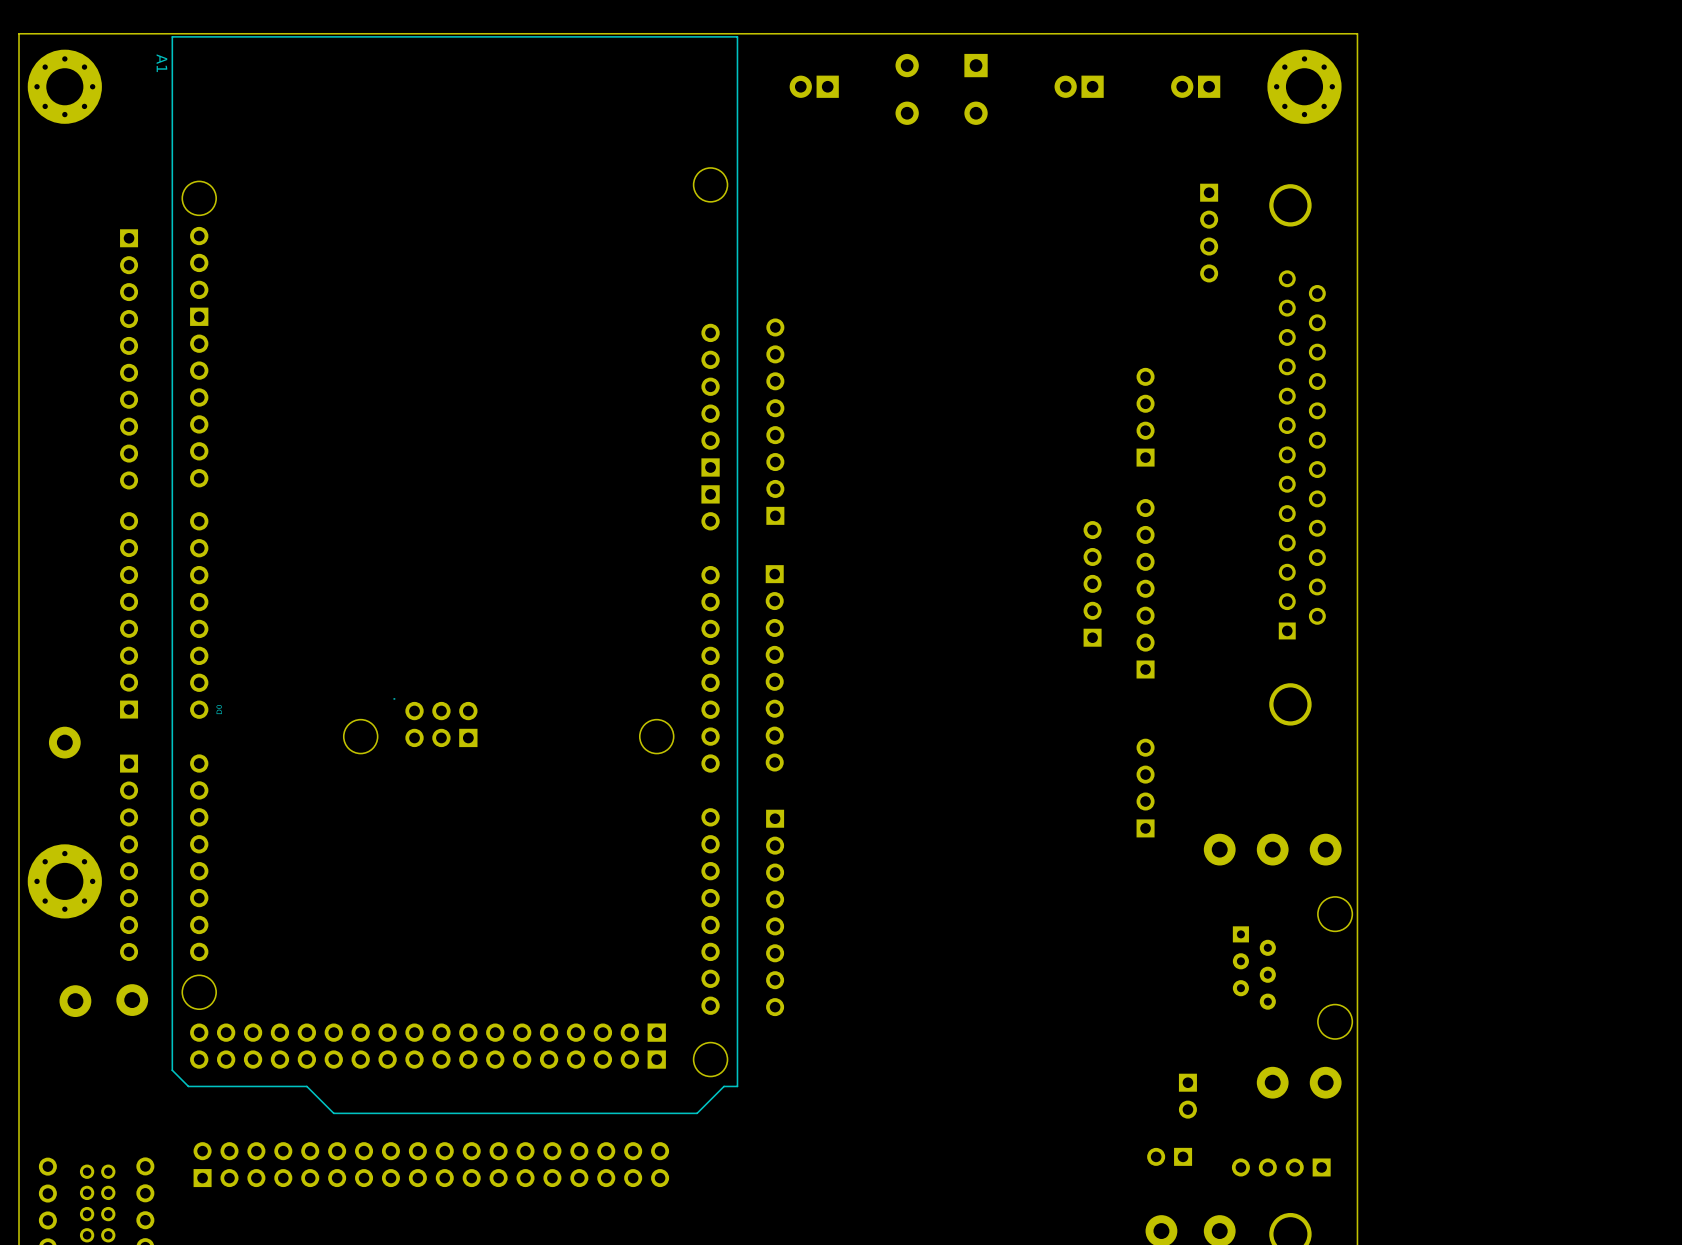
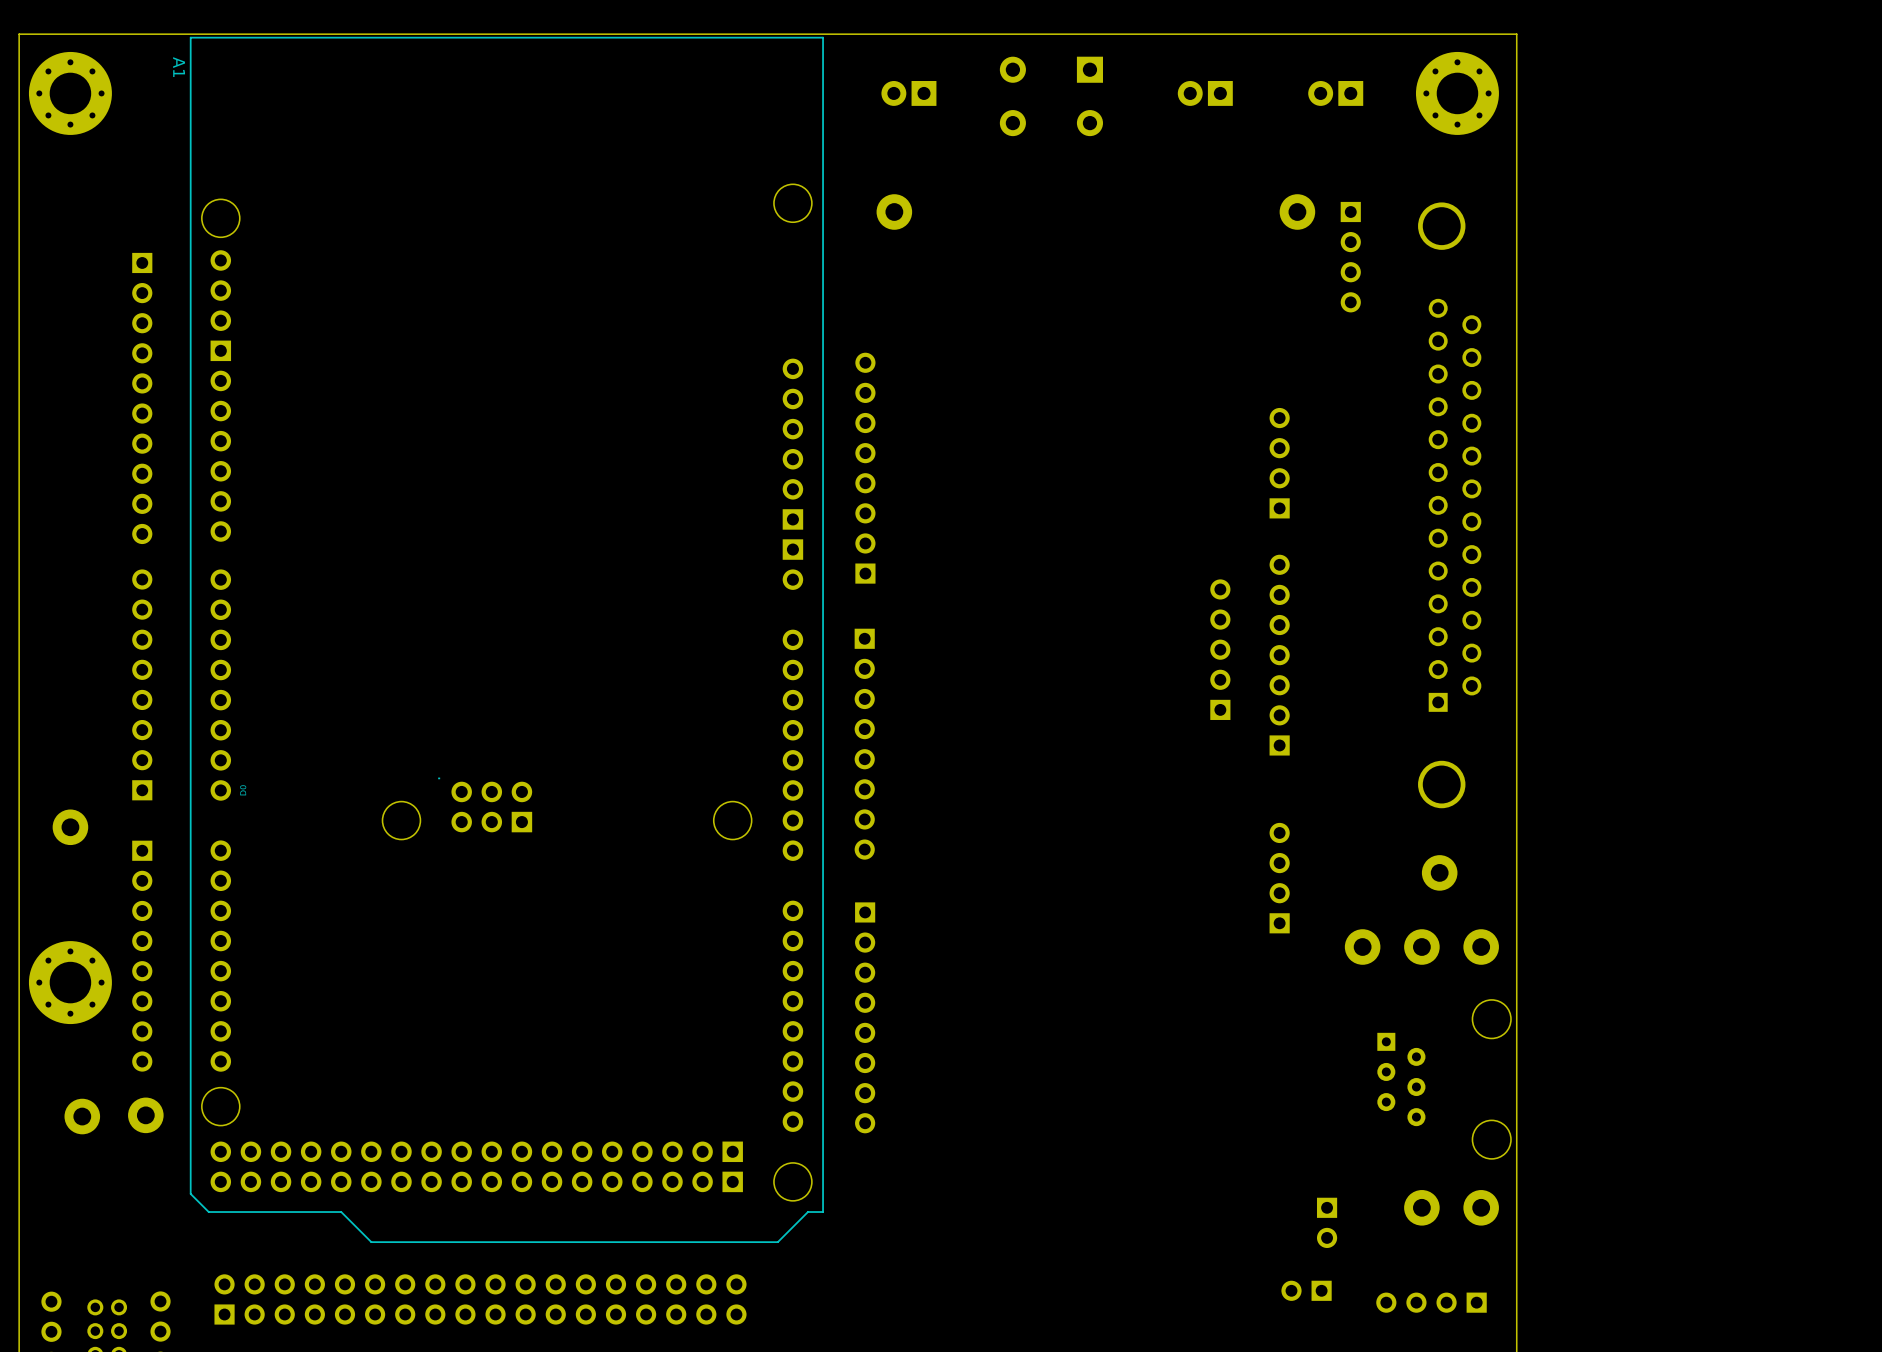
part: none -> (894, 212)
part: none -> (1297, 212)
part: none -> (1439, 872)

